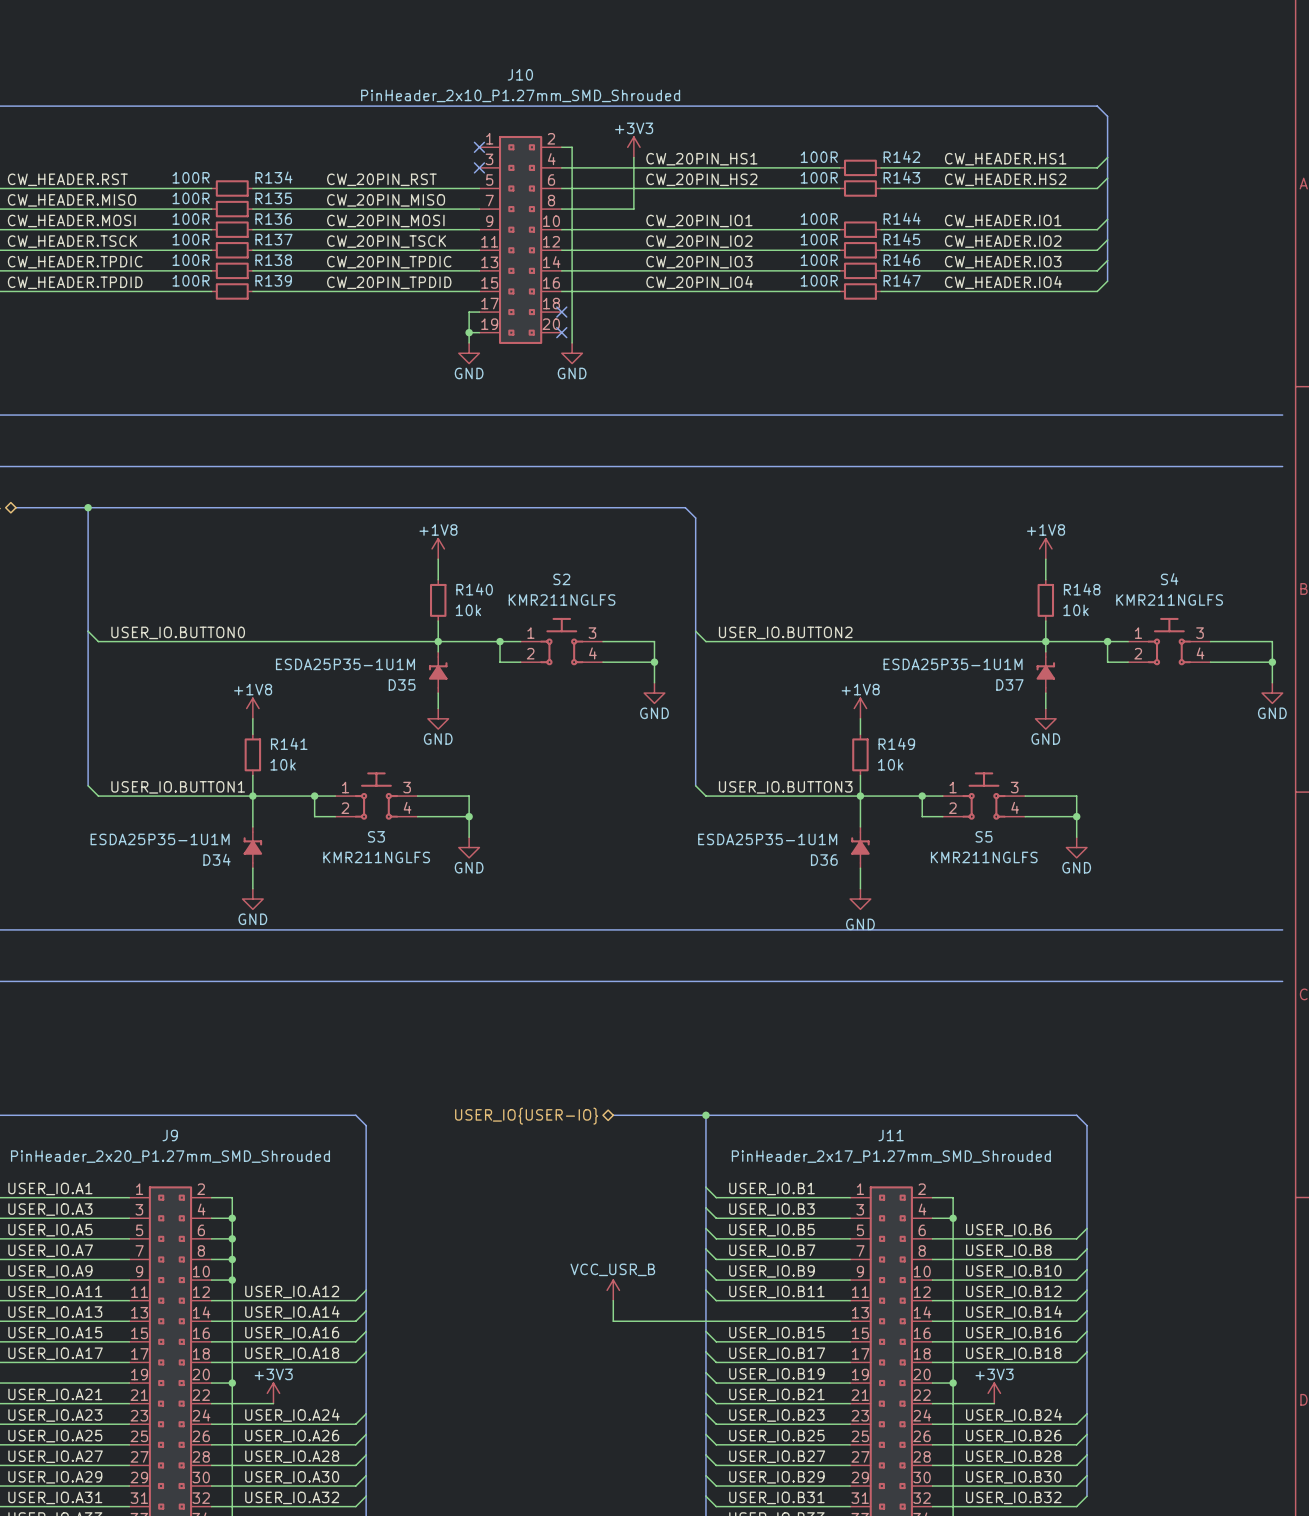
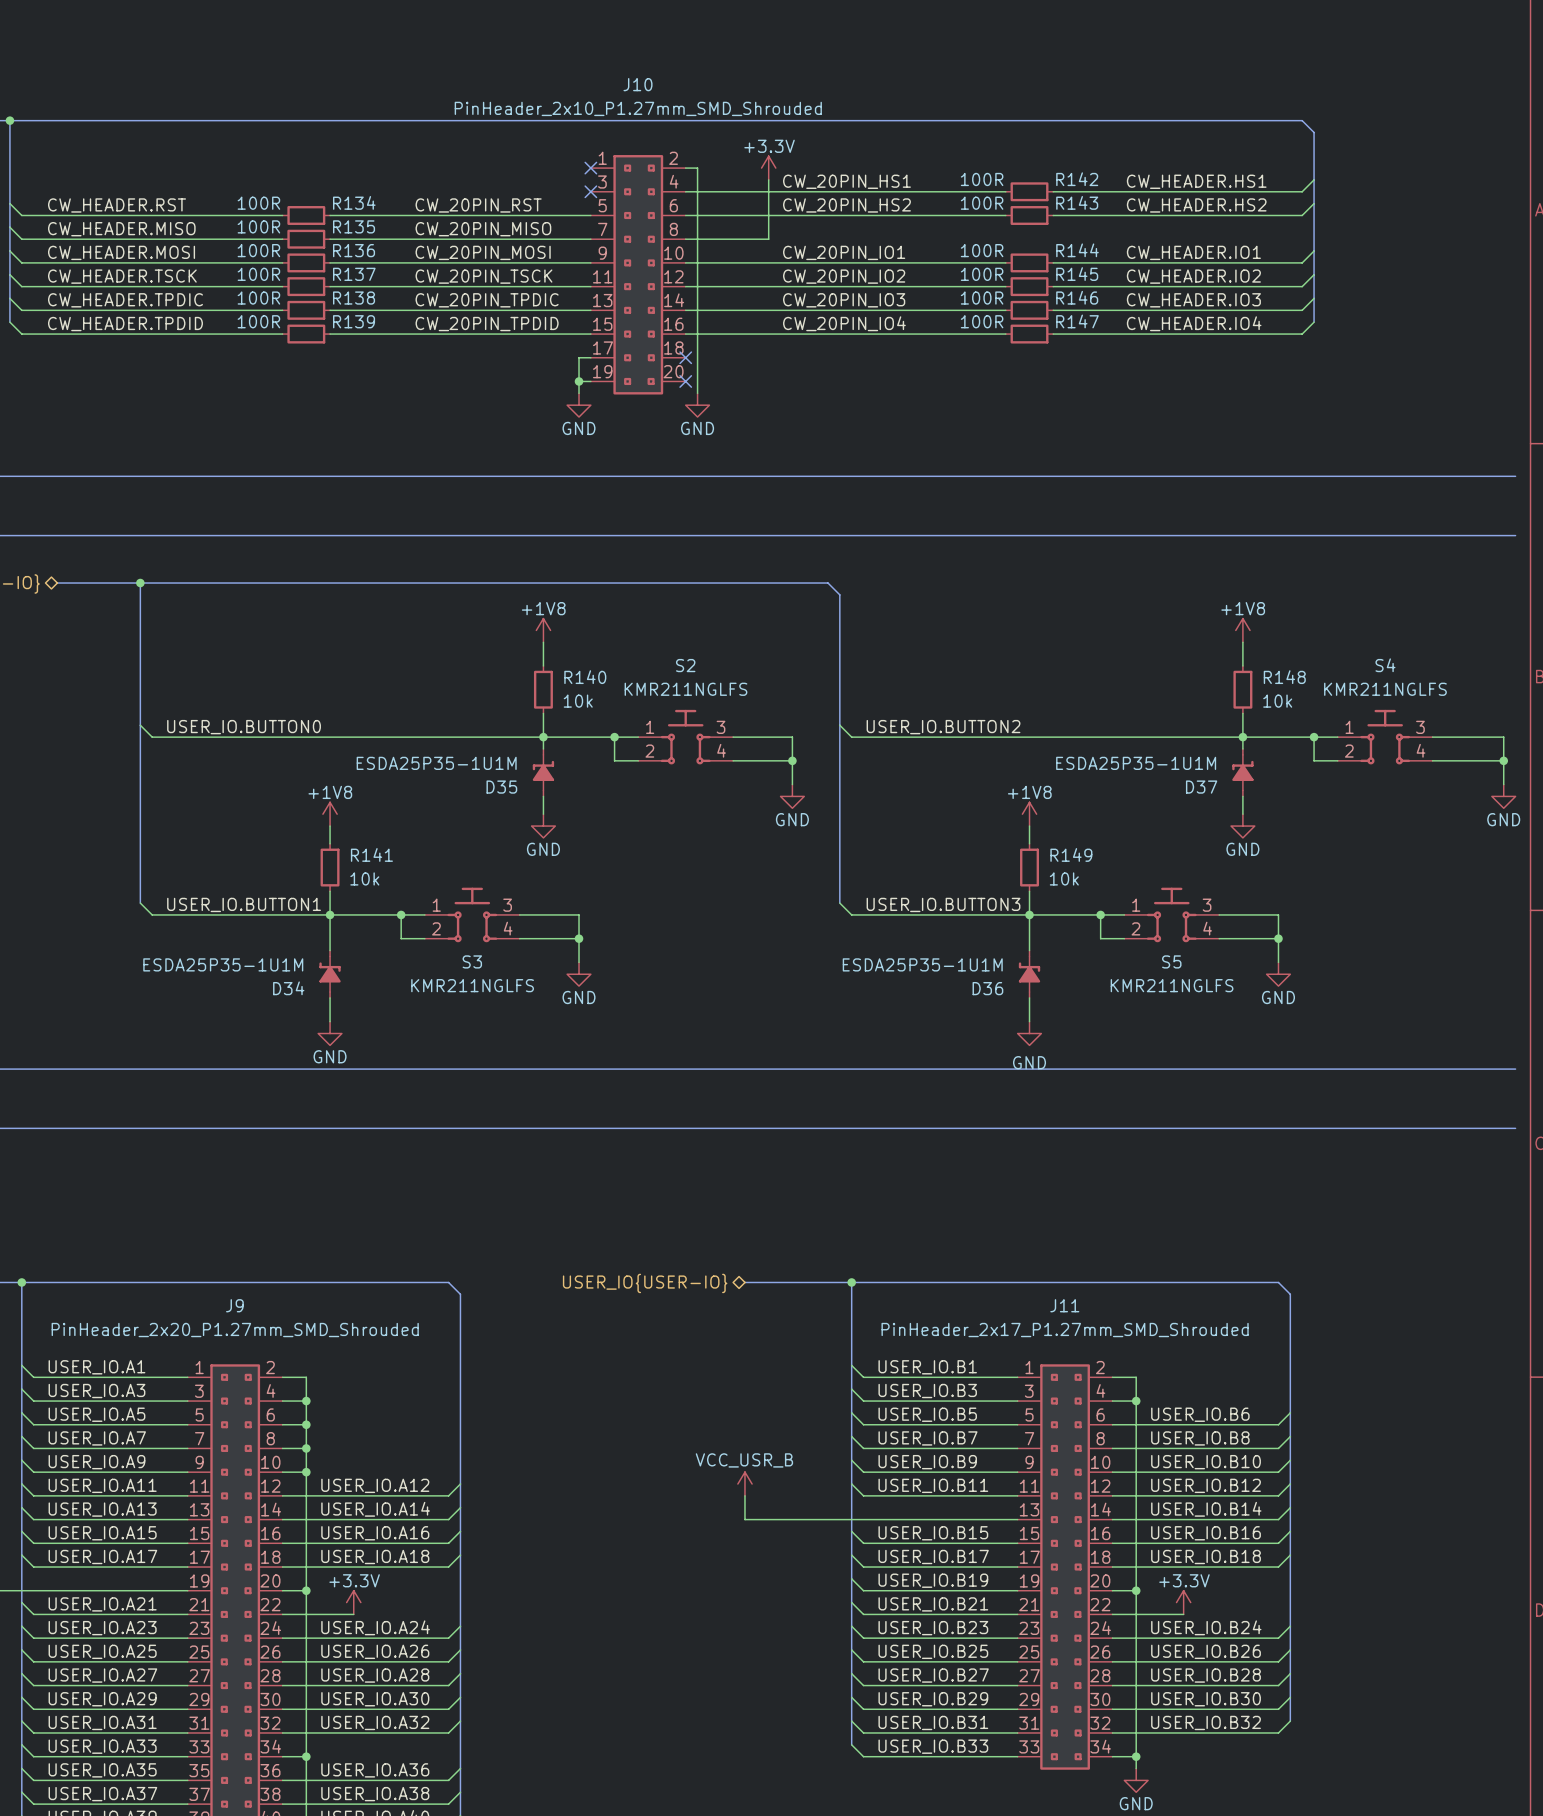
power symbol: +3V3 (633, 147) -> +3.3V (768, 168)
power symbol: +3V3 (273, 1393) -> +3.3V (353, 1602)
power symbol: +3V3 (994, 1393) -> +3.3V (1183, 1602)

